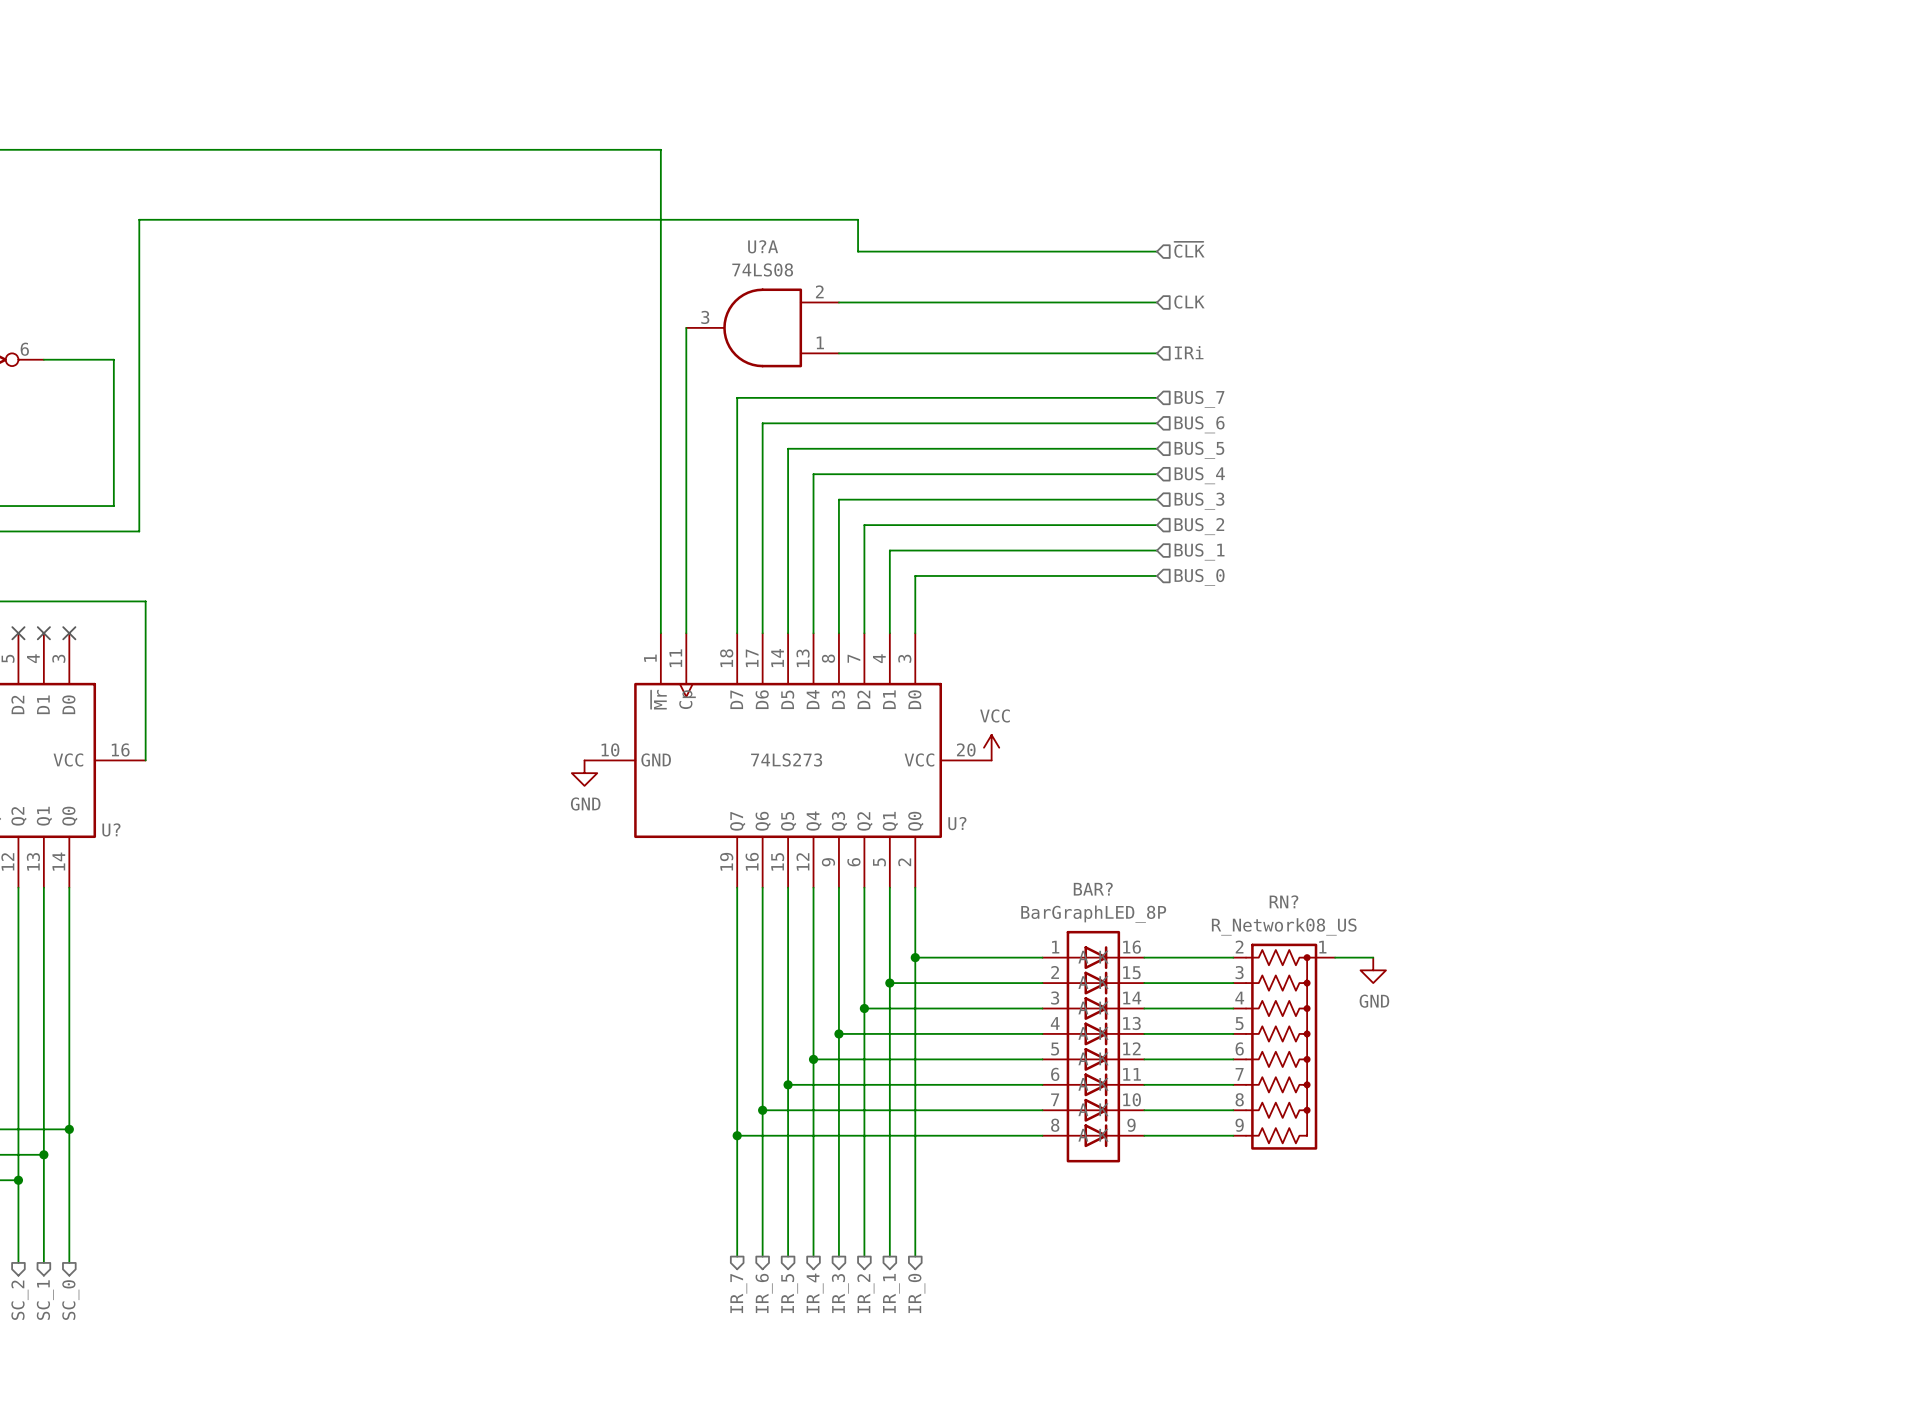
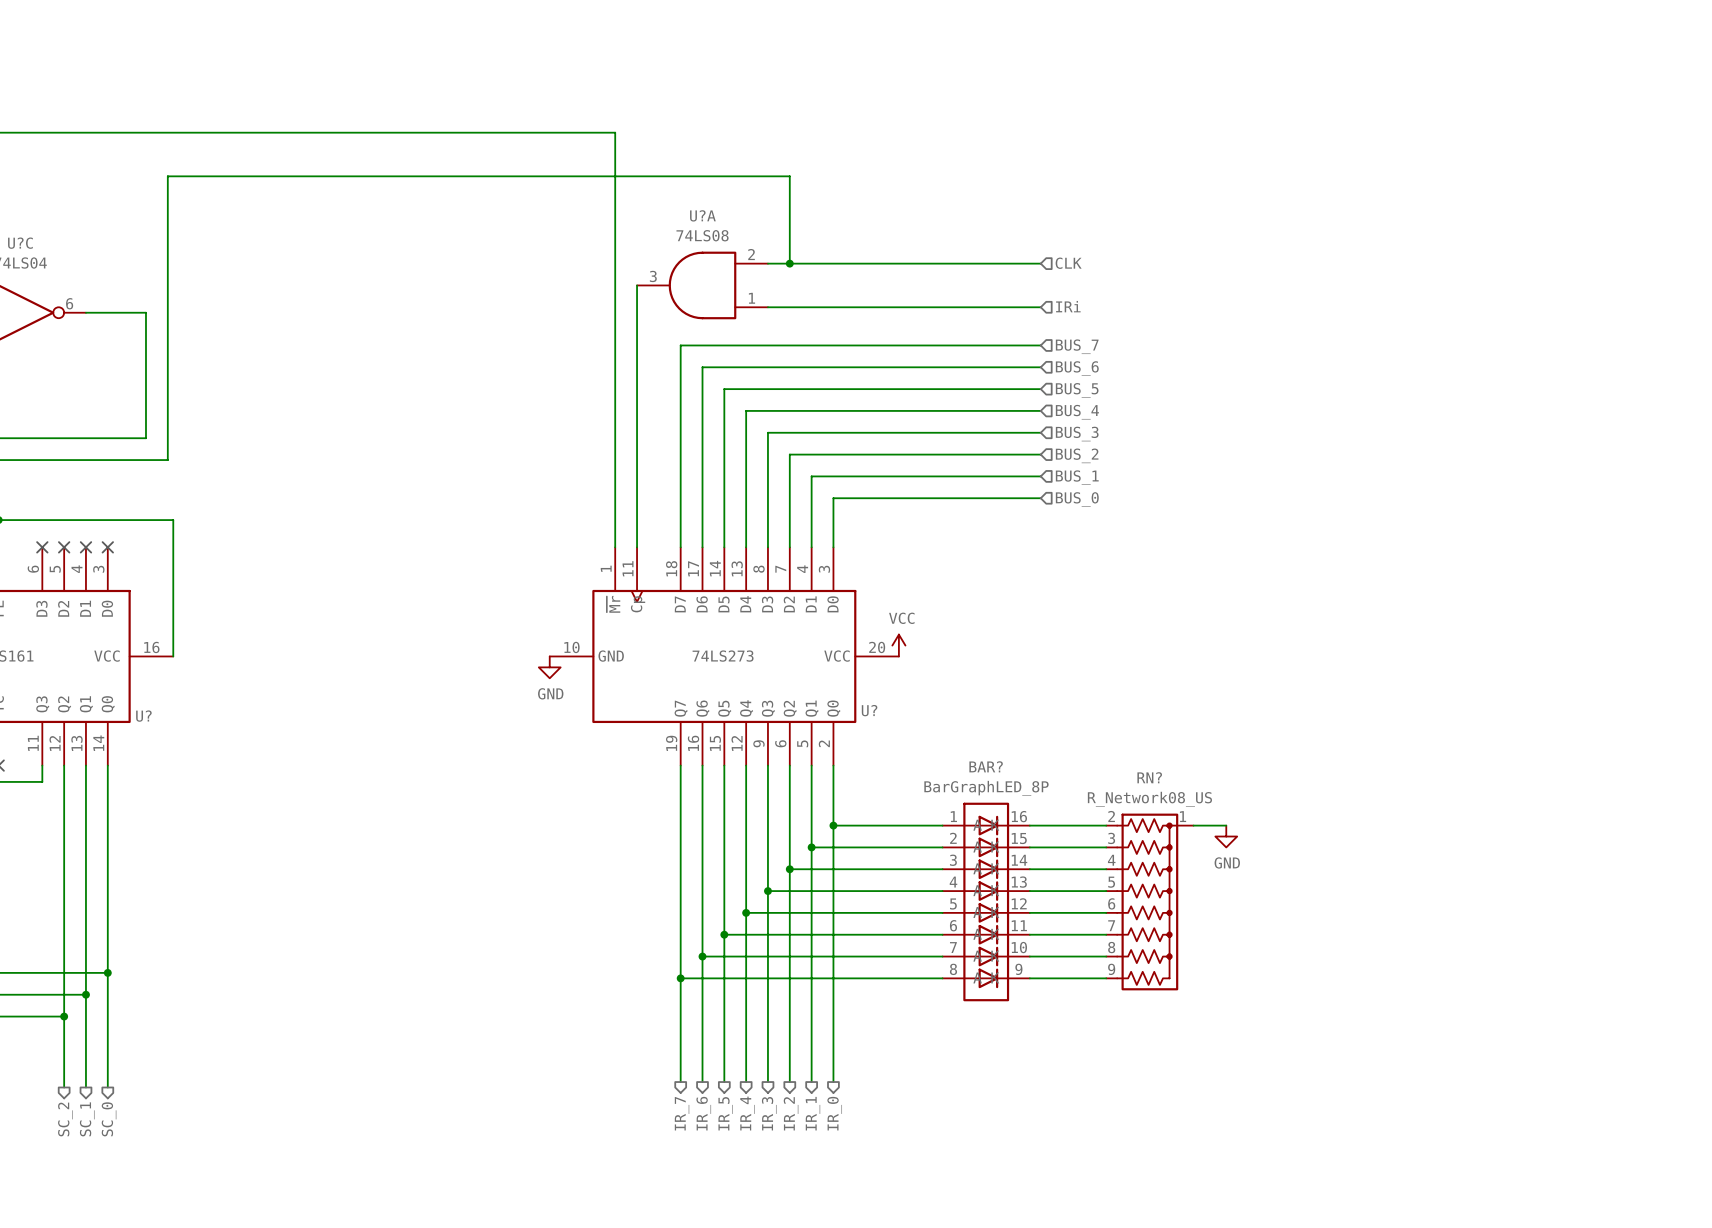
wire: (139, 219) (858, 219) (858, 251) (1156, 251) -> (167, 192) (167, 176) (789, 176) (789, 263)
hierarchical label: ~{CLK} (1189, 249) -> none
junction: none -> (789, 263)

